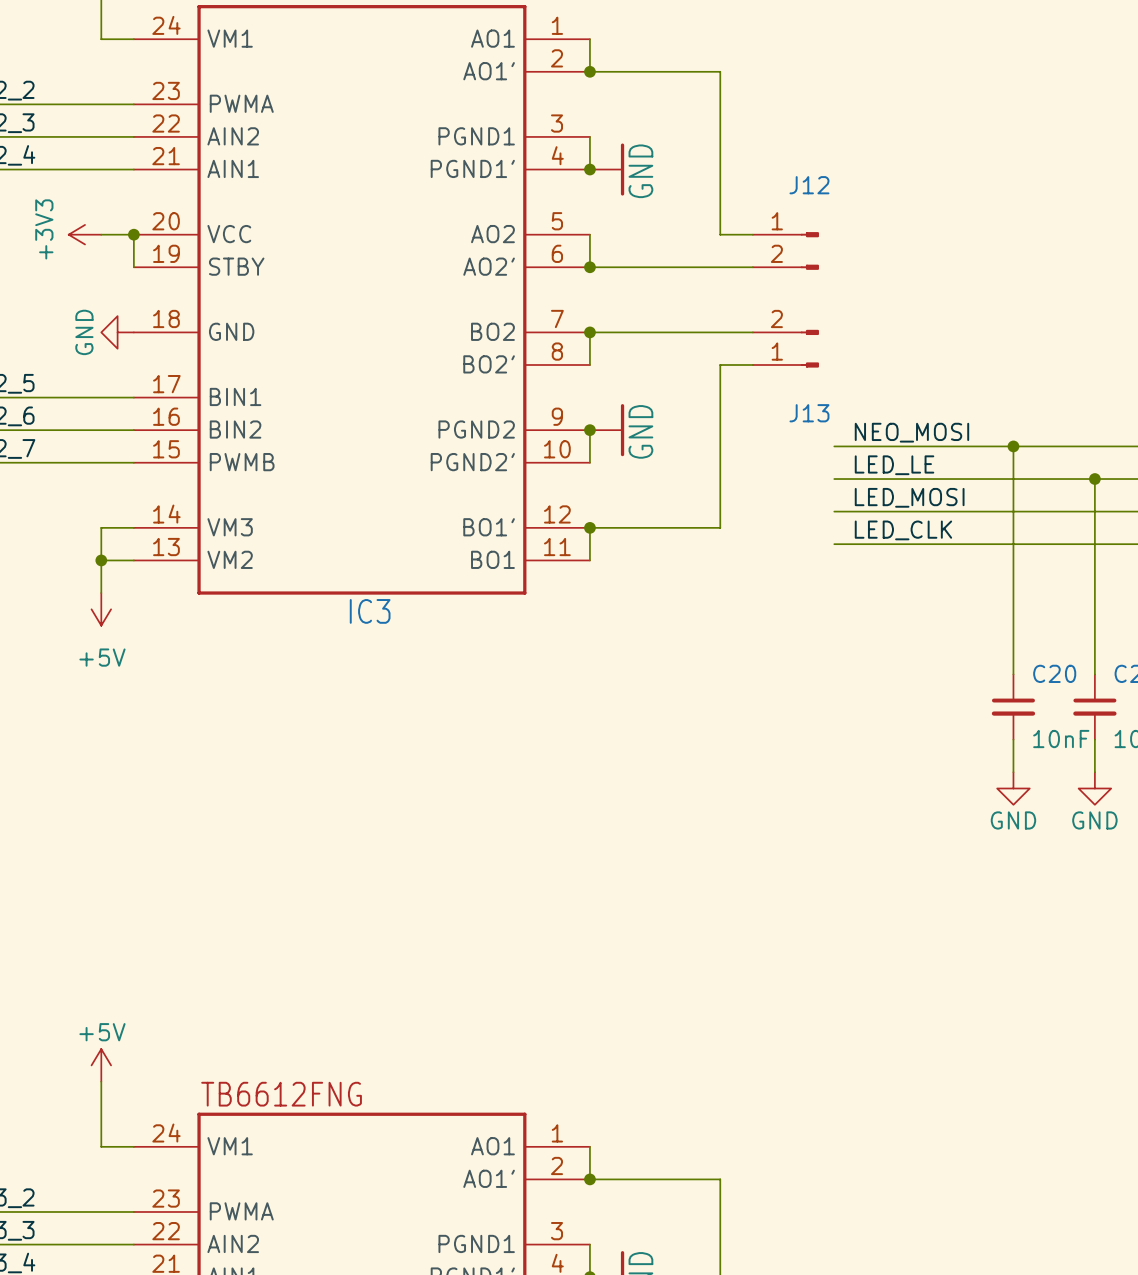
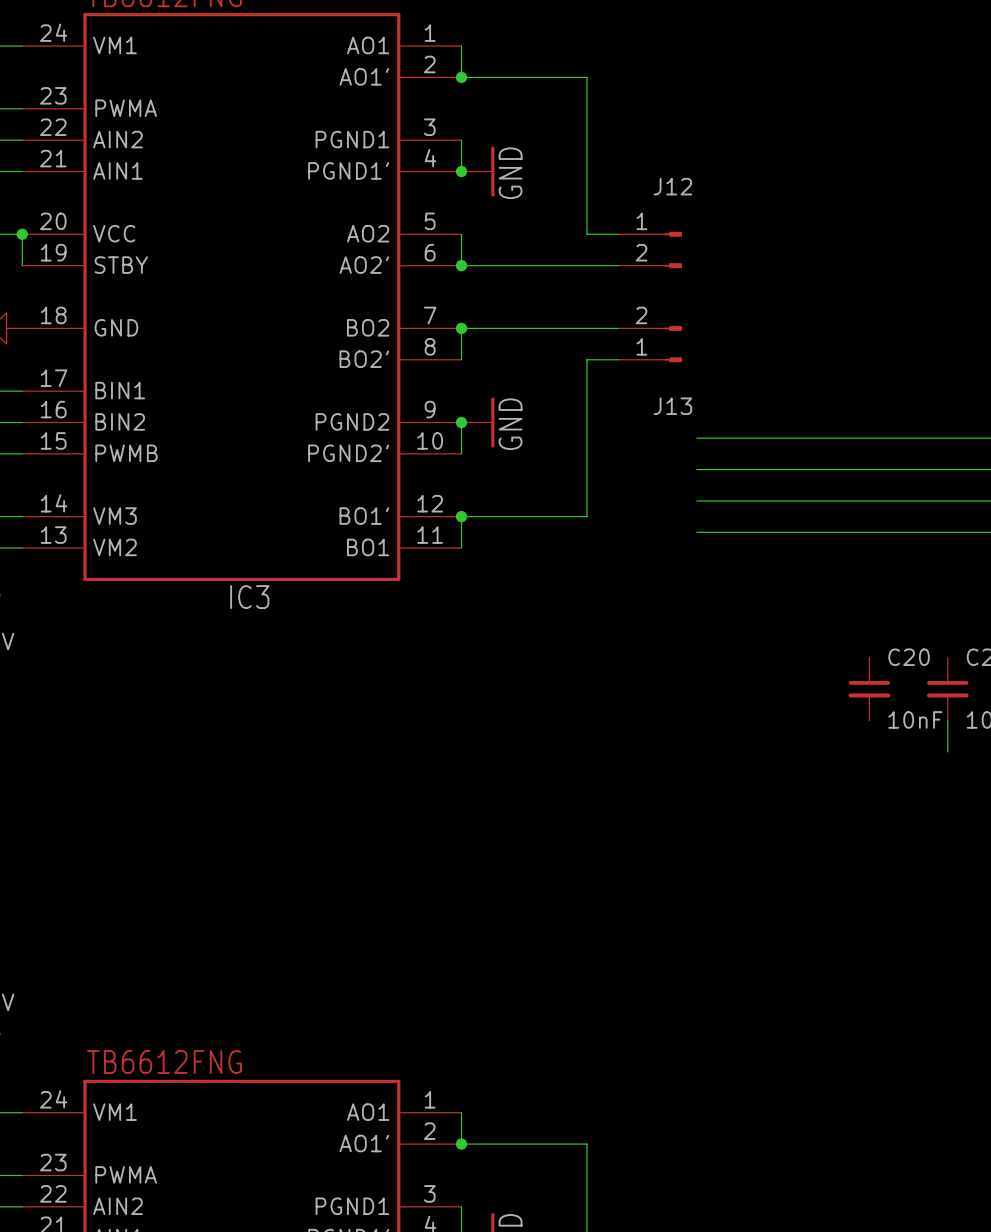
label: NEO_MOSI (911, 432) -> none
wire: (1013, 446) (1013, 674) -> none
junction: (1013, 446) -> none
label: LED_LE (894, 465) -> none
wire: (1094, 479) (1094, 674) -> none
junction: (1094, 479) -> none
label: LED_MOSI (909, 497) -> none
label: LED_CLK (903, 530) -> none
wire: (1013, 739) (1013, 772) -> none
power symbol: GND (1013, 788) -> none
power symbol: GND (1094, 788) -> none

